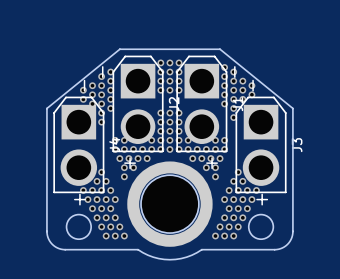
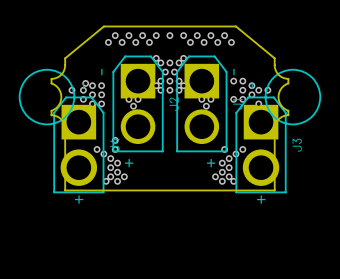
via: none -> (115, 35)
via: none -> (128, 35)
via: none -> (142, 35)
via: none -> (156, 35)
via: none -> (169, 35)
via: none -> (183, 35)
via: none -> (197, 35)
via: none -> (210, 35)
via: none -> (224, 35)
via: none -> (108, 42)
via: none -> (122, 42)
via: none -> (135, 42)
via: none -> (149, 42)
via: none -> (190, 42)
via: none -> (204, 42)
via: none -> (217, 42)
via: none -> (231, 42)
board edge: (119, 49) (220, 49) (292, 108) (292, 231) (291, 239) (286, 245) (274, 249) (201, 249) (186, 257) (169, 259) (153, 257) (138, 249) (63, 249) (50, 242) (46, 231) (46, 108) (119, 49) -> (103, 26) (65, 58) (63, 72) (58, 77) (51, 78) (51, 83) (58, 88) (61, 95) (59, 103) (51, 110) (51, 115) (61, 119) (65, 127) (65, 190) (274, 190) (274, 127) (280, 118) (288, 115) (288, 110) (281, 105) (278, 97) (281, 88) (288, 83) (288, 78) (281, 77) (276, 72) (274, 58) (235, 26) (103, 26)
via: none -> (156, 58)
via: none -> (183, 58)
via: (224, 67) -> none
drawing: none -> [19, 69, 75, 125]
drawing: none -> [265, 69, 321, 125]
via: (110, 72) -> none
via: (160, 72) -> none
via: none -> (165, 72)
via: (169, 72) -> none
via: none -> (174, 72)
via: (179, 72) -> none
via: (233, 72) -> none
via: (101, 76) -> none
via: (224, 76) -> none
via: (110, 81) -> none
via: none -> (85, 83)
via: none -> (156, 85)
via: none -> (183, 85)
via: (224, 85) -> none
via: none -> (72, 90)
via: (110, 90) -> none
via: (233, 90) -> none
via: none -> (258, 90)
via: none -> (267, 90)
via: (224, 94) -> none
via: (110, 99) -> none
via: none -> (128, 99)
via: none -> (138, 99)
via: none -> (201, 99)
via: none -> (210, 99)
via: (224, 103) -> none
via: none -> (258, 103)
via: none -> (133, 106)
via: none -> (206, 106)
via: (110, 108) -> none
via: (233, 108) -> none
via: (101, 113) -> none
via: (160, 113) -> none
via: (169, 113) -> none
via: (179, 113) -> none
via: (233, 117) -> none
via: (101, 122) -> none
via: (160, 122) -> none
via: (169, 122) -> none
via: (179, 122) -> none
via: (160, 131) -> none
via: (169, 131) -> none
via: (179, 131) -> none
via: (124, 140) -> none
via: (151, 140) -> none
via: (160, 140) -> none
via: (169, 140) -> none
via: (179, 140) -> none
via: (188, 140) -> none
via: (215, 140) -> none
via: (224, 140) -> none
via: none -> (97, 149)
via: (124, 149) -> none
via: (133, 149) -> none
via: (142, 149) -> none
via: (151, 149) -> none
via: (160, 149) -> none
via: (169, 149) -> none
via: (179, 149) -> none
via: (188, 149) -> none
via: (197, 149) -> none
via: (206, 149) -> none
via: (215, 149) -> none
via: none -> (242, 149)
via: none -> (103, 154)
via: none -> (235, 154)
via: none -> (110, 158)
via: (119, 158) -> none
via: (128, 158) -> none
via: (138, 158) -> none
via: (147, 158) -> none
via: (192, 158) -> none
via: (201, 158) -> none
via: (210, 158) -> none
via: (220, 158) -> none
via: none -> (229, 158)
via: none -> (117, 163)
via: none -> (222, 163)
via: none -> (110, 167)
via: (124, 167) -> none
via: (133, 167) -> none
via: (206, 167) -> none
via: (215, 167) -> none
via: none -> (229, 167)
via: (101, 172) -> none
via: none -> (117, 172)
via: none -> (222, 172)
via: (238, 172) -> none
via: none -> (110, 176)
via: none -> (229, 176)
via: (97, 181) -> none
via: none -> (117, 181)
via: none -> (222, 181)
via: (242, 181) -> none
via: (83, 190) -> none
via: (92, 190) -> none
via: (101, 190) -> none
via: (110, 190) -> none
via: (229, 190) -> none
via: (238, 190) -> none
via: (247, 190) -> none
via: (256, 190) -> none
via: (87, 199) -> none
via: (97, 199) -> none
via: (106, 199) -> none
via: (115, 199) -> none
via: (224, 199) -> none
via: (233, 199) -> none
via: (242, 199) -> none
via: (251, 199) -> none
part: (169, 204) -> none
via: (92, 208) -> none
via: (101, 208) -> none
via: (110, 208) -> none
via: (229, 208) -> none
via: (238, 208) -> none
via: (247, 208) -> none
round board edge: [66, 214, 92, 240] -> none
round board edge: [248, 214, 274, 240] -> none
via: (97, 217) -> none
via: (106, 217) -> none
via: (115, 217) -> none
via: (224, 217) -> none
via: (233, 217) -> none
via: (242, 217) -> none
via: (101, 226) -> none
via: (110, 226) -> none
via: (119, 226) -> none
via: (220, 226) -> none
via: (229, 226) -> none
via: (238, 226) -> none
via: (106, 236) -> none
via: (115, 236) -> none
via: (124, 236) -> none
via: (215, 236) -> none
via: (224, 236) -> none
via: (233, 236) -> none

